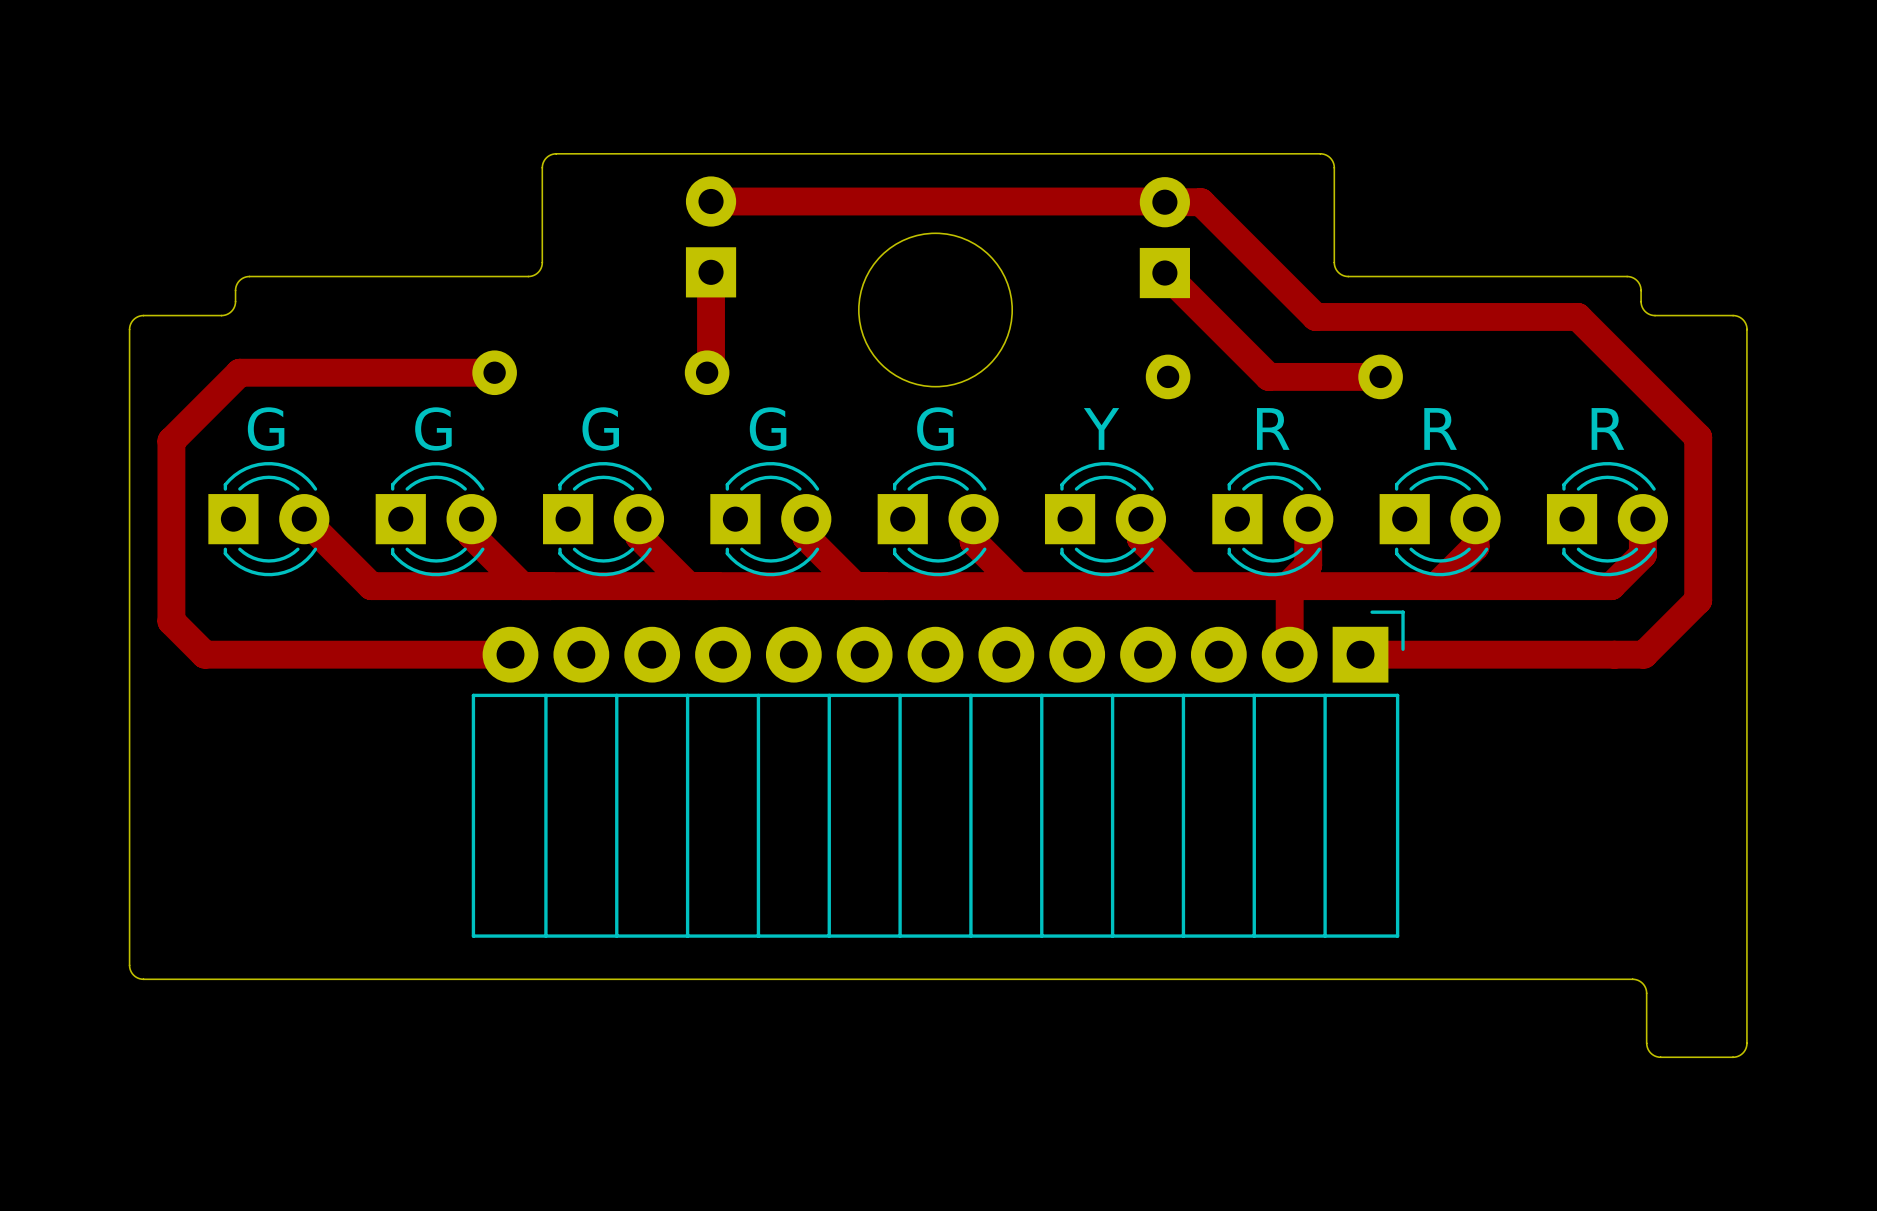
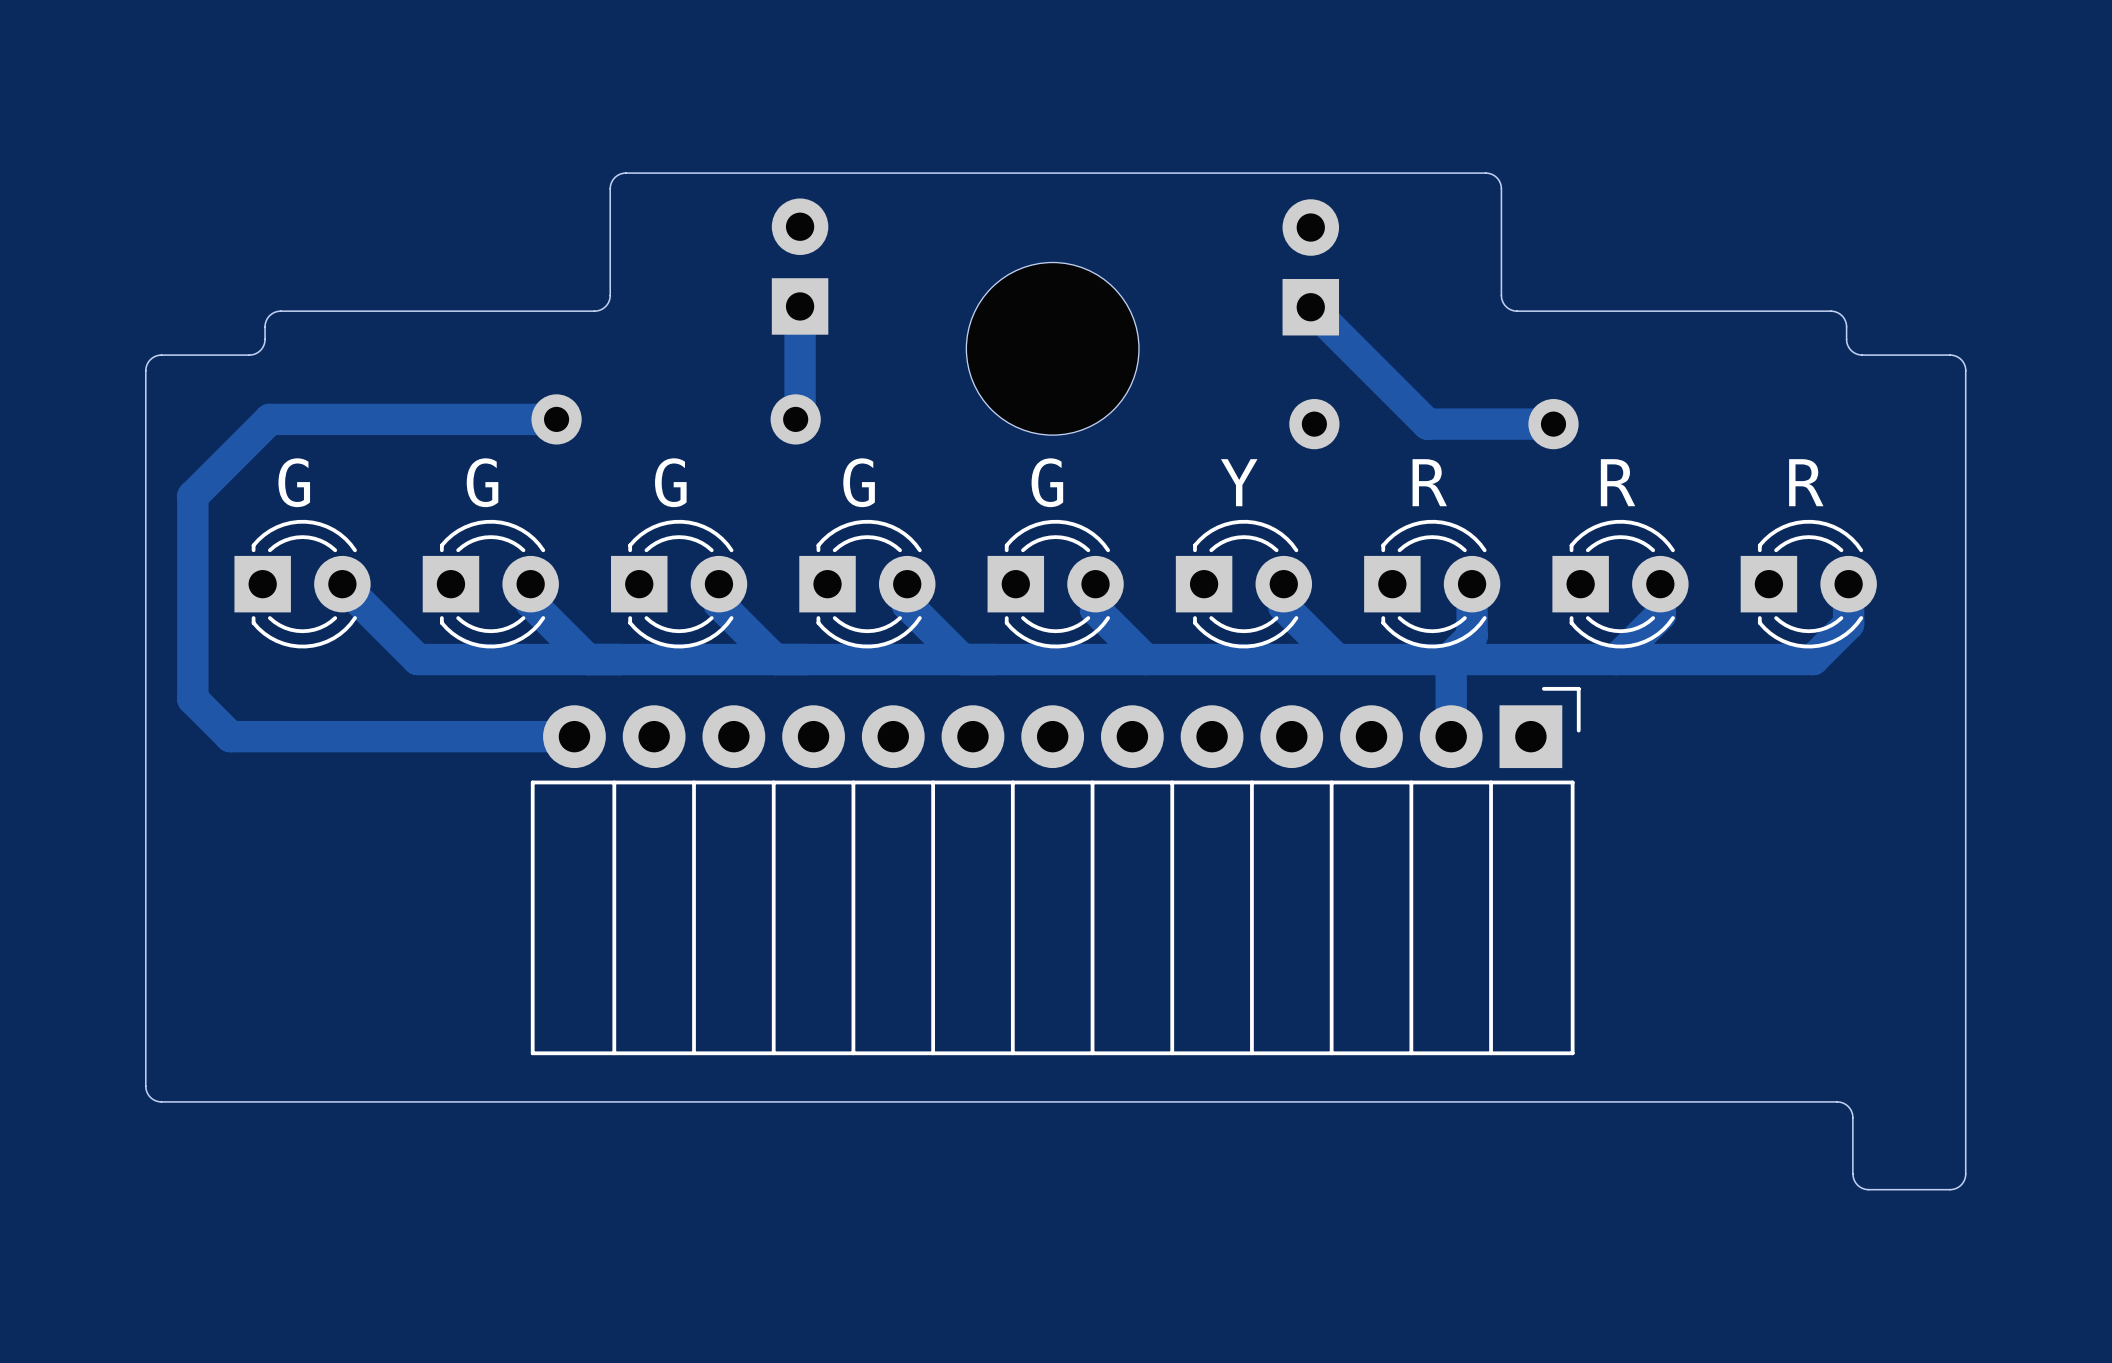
track: (711, 201) (1200, 202) (1315, 316) (1577, 316) (1698, 437) (1698, 600) (1643, 654) (1360, 654) -> none

